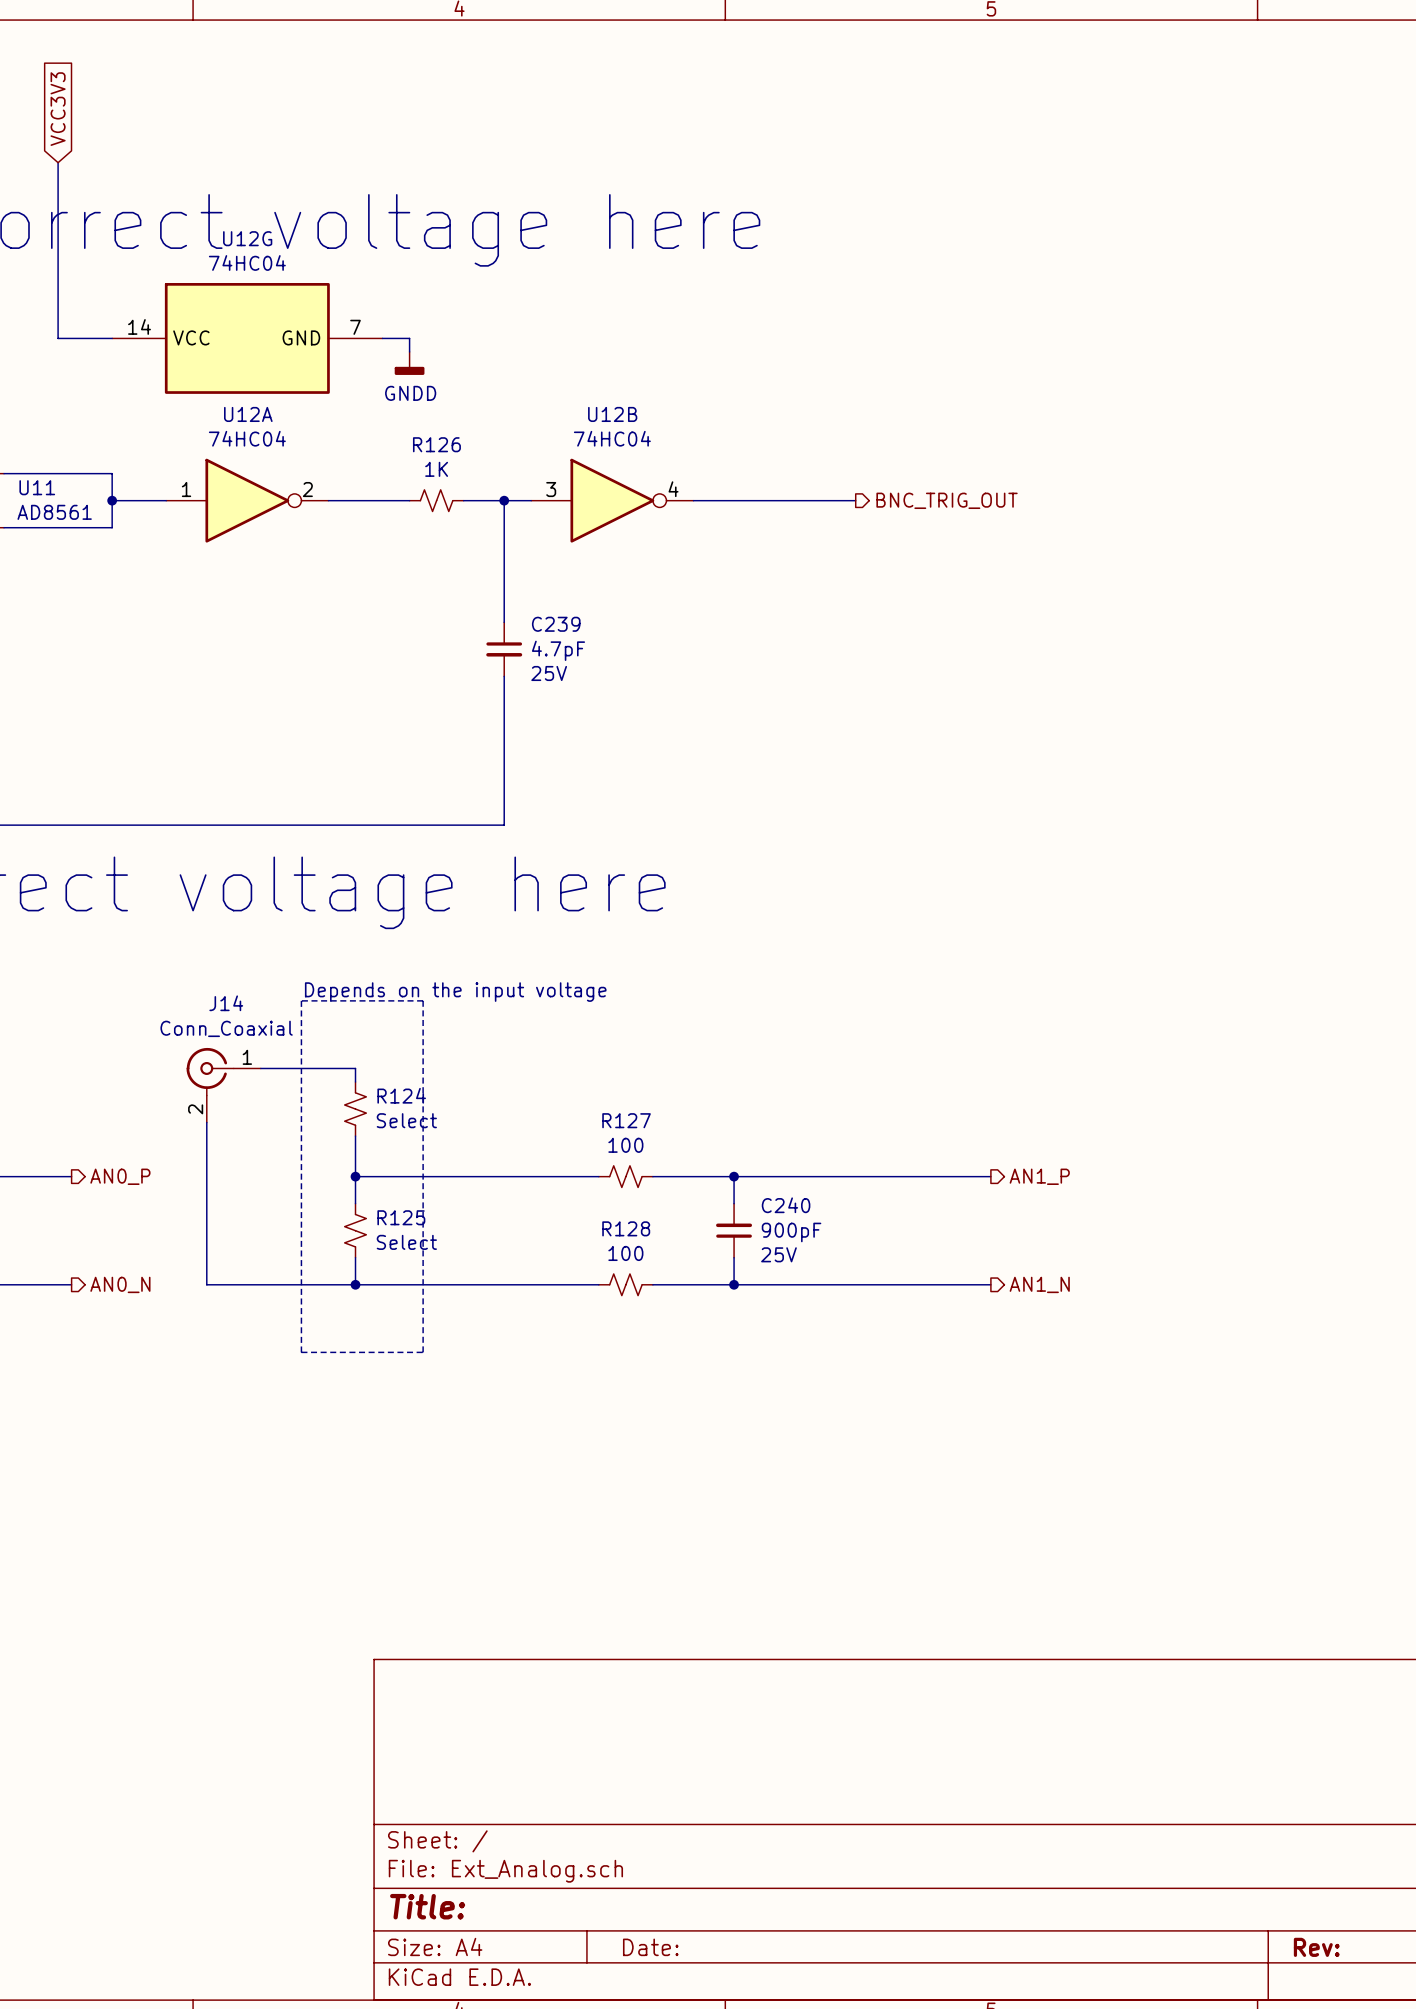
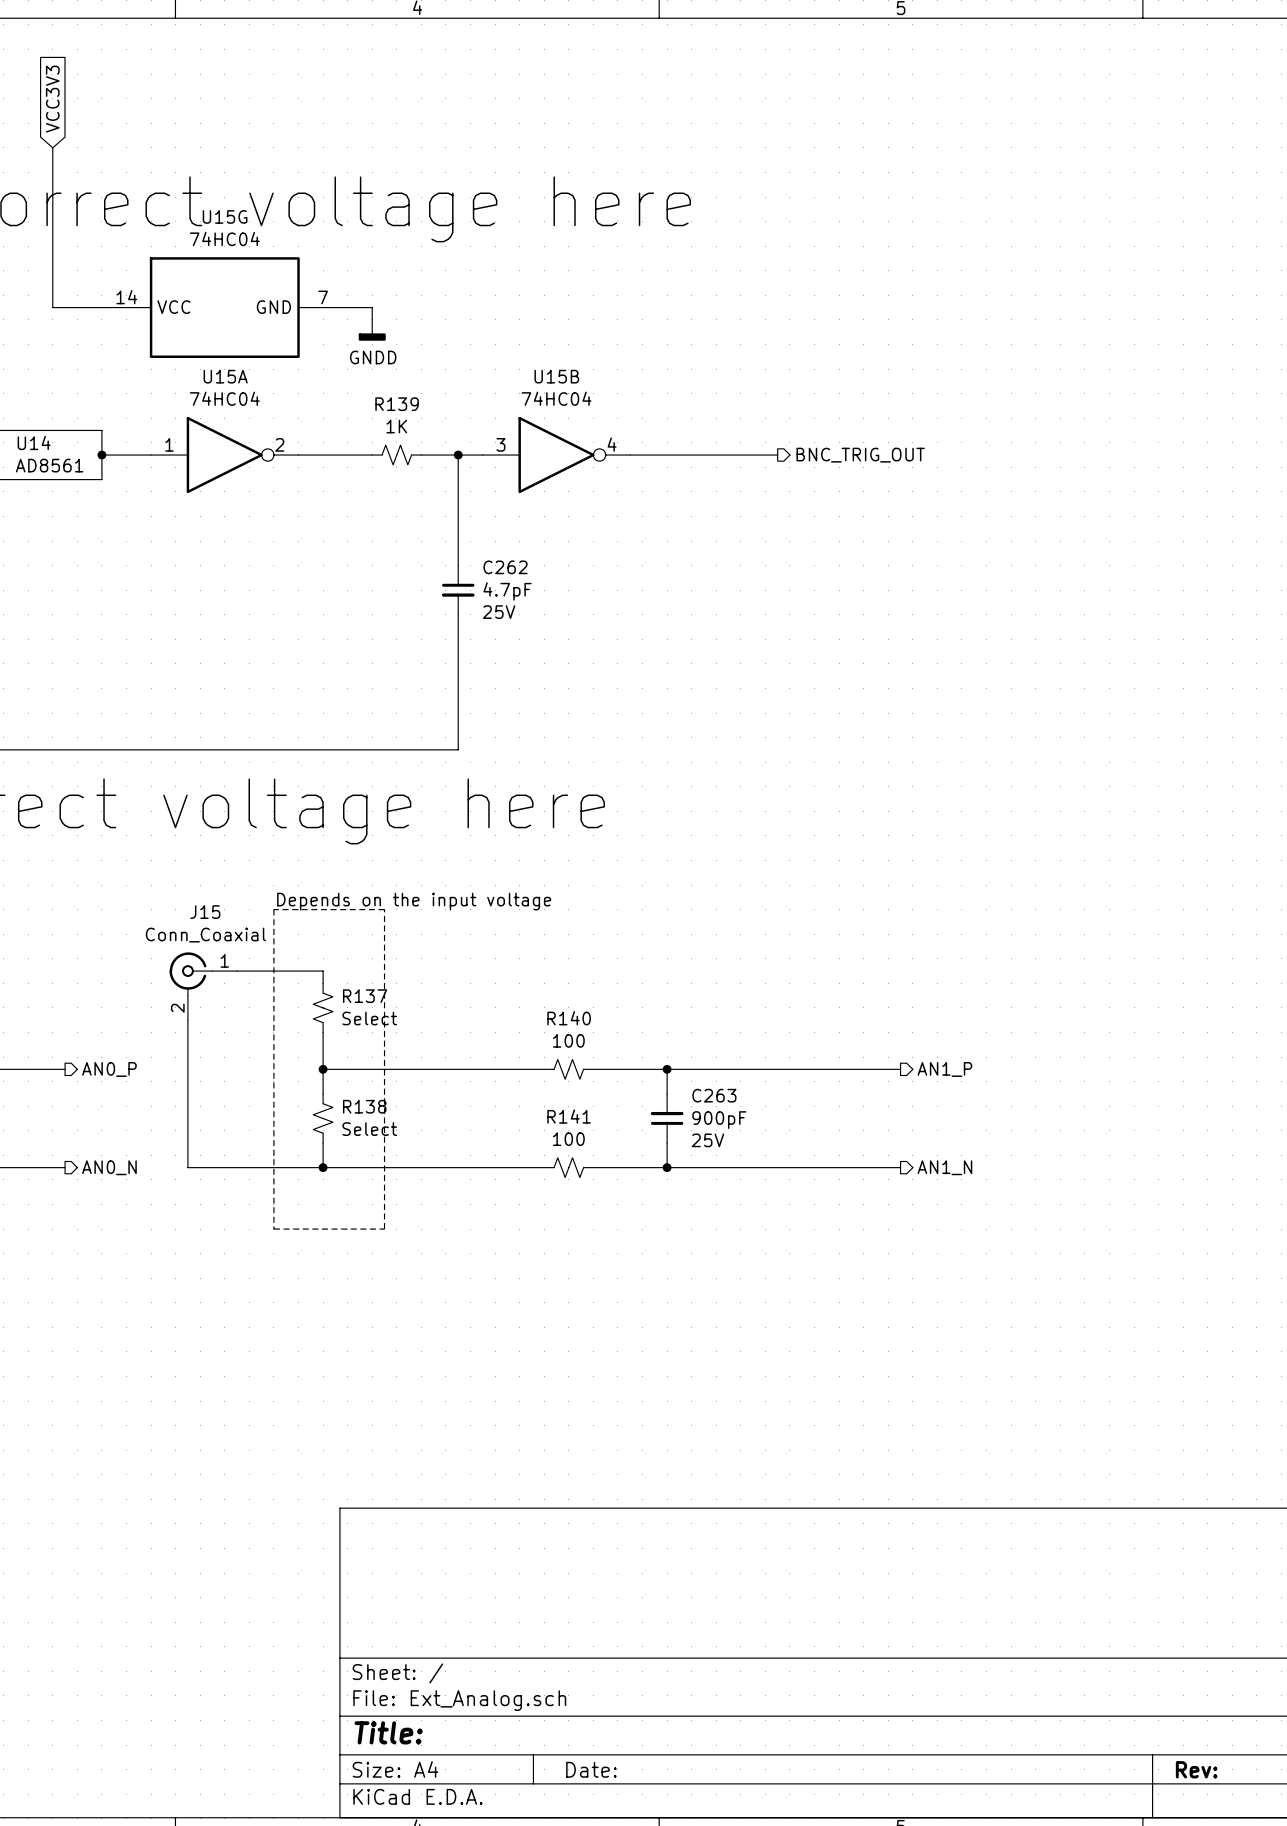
U12G name: U12G (247, 238) -> U15G (225, 216)
U12A name: U12A (248, 414) -> U15A (225, 376)
U12B name: U12B (612, 414) -> U15B (556, 376)
R126 name: R126 (436, 444) -> R139 (397, 404)
U11 name: U11 (37, 487) -> U14 (34, 442)
C239 name: C239 (556, 624) -> C262 (505, 567)
J14 name: J14 (226, 1003) -> J15 (205, 912)
R124 name: R124 (401, 1095) -> R137 (365, 996)
R127 name: R127 (626, 1120) -> R140 (569, 1018)
C240 name: C240 (786, 1205) -> C263 (714, 1095)
R125 name: R125 (401, 1217) -> R138 (364, 1106)
R128 name: R128 (626, 1228) -> R141 (569, 1116)

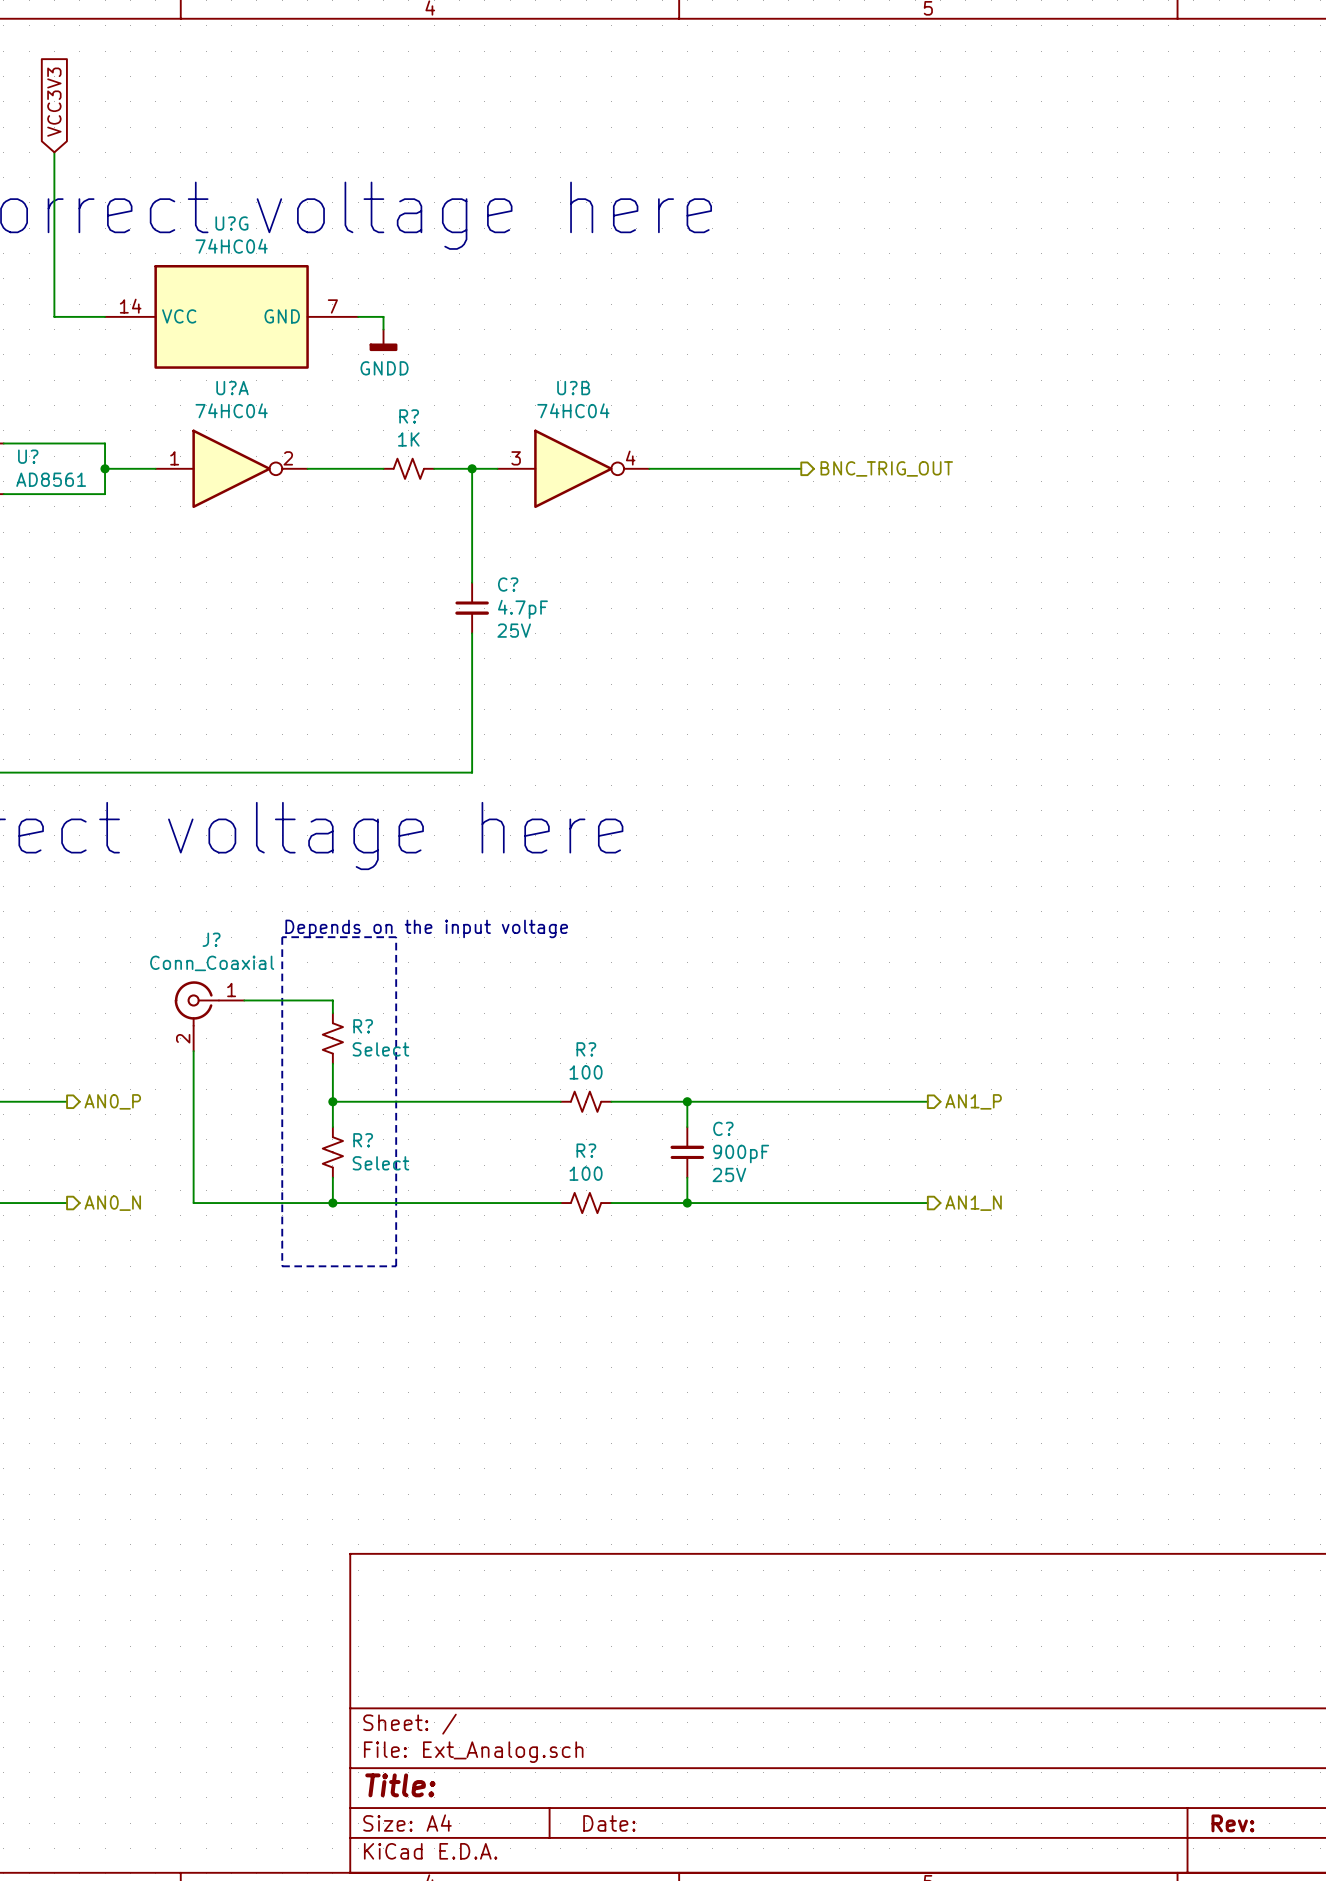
U15G name: U15G (225, 216) -> U?G (231, 223)
U15A name: U15A (225, 376) -> U?A (232, 388)
U15B name: U15B (556, 376) -> U?B (573, 388)
R139 name: R139 (397, 404) -> R? (409, 416)
U14 name: U14 (34, 442) -> U? (28, 456)
C262 name: C262 (505, 567) -> C? (508, 584)
J15 name: J15 (205, 912) -> J? (211, 939)
R137 name: R137 (365, 996) -> R? (363, 1026)
R140 name: R140 (569, 1018) -> R? (586, 1049)
C263 name: C263 (714, 1095) -> C? (723, 1128)
R138 name: R138 (364, 1106) -> R? (363, 1140)
R141 name: R141 (569, 1116) -> R? (586, 1150)

